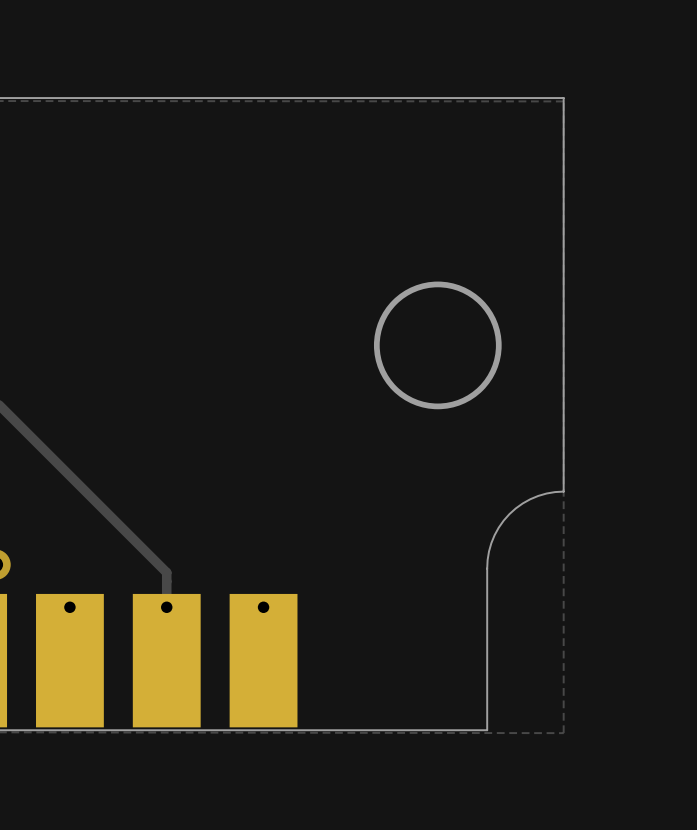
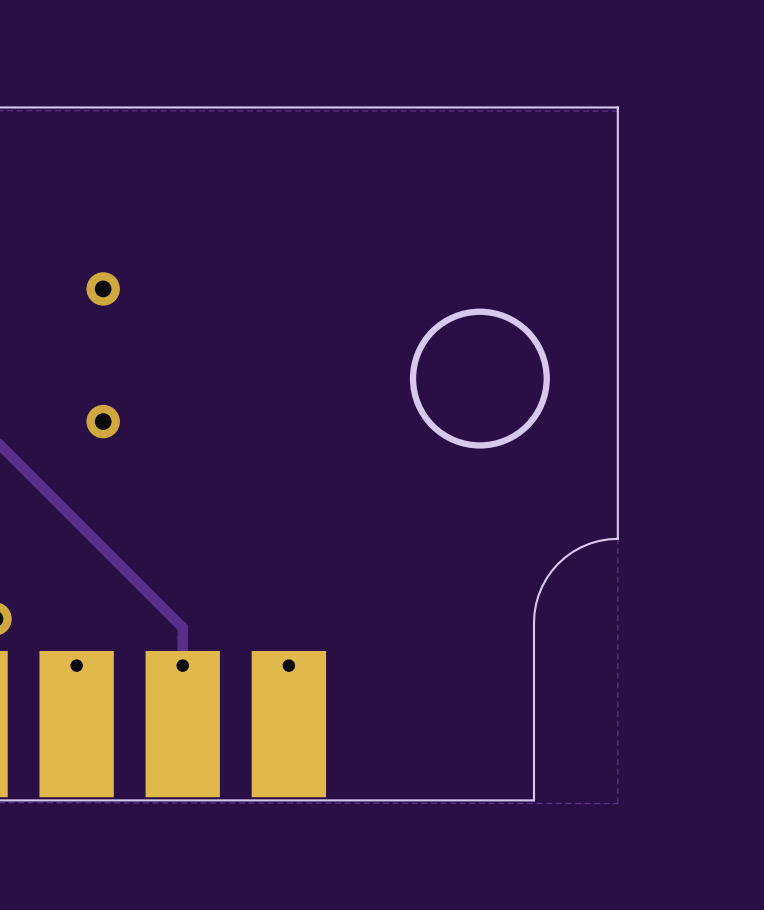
via: none -> (103, 288)
via: none -> (103, 421)

